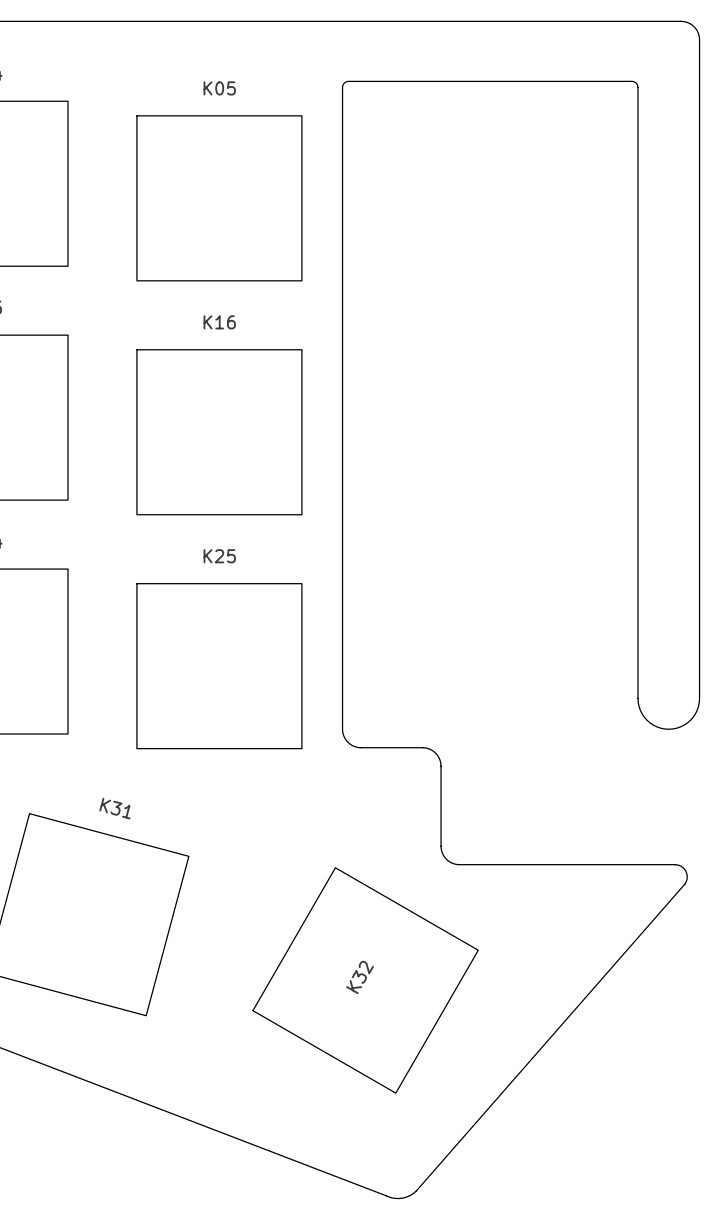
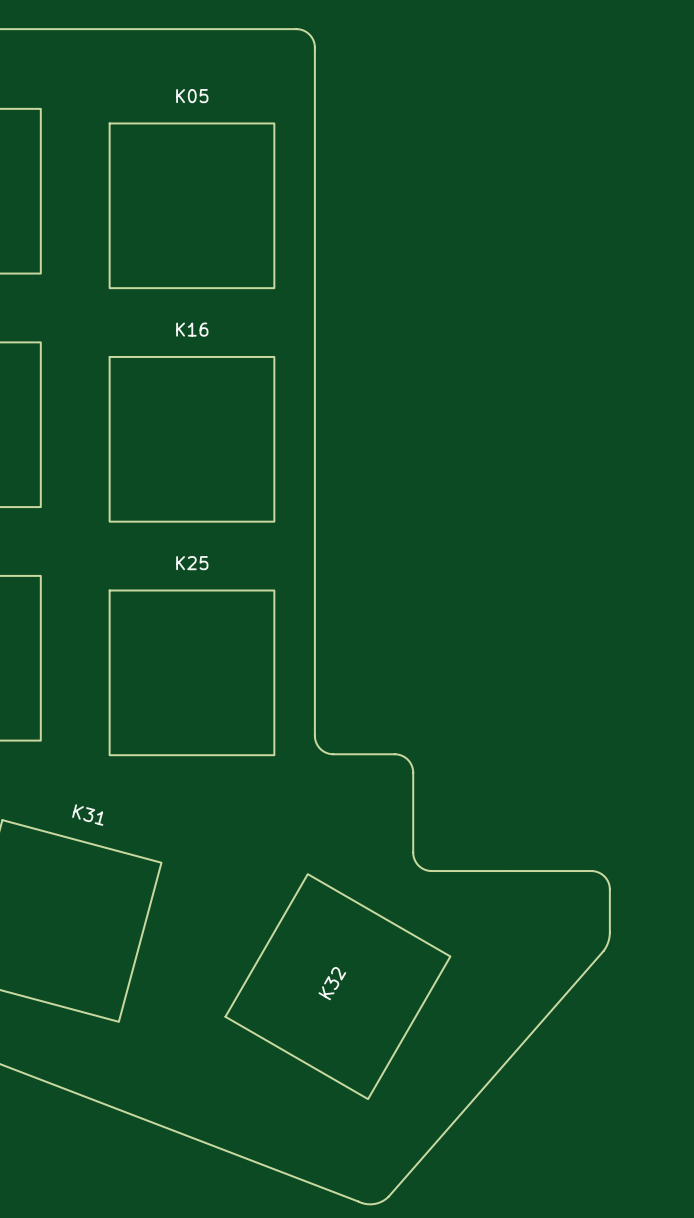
board edge: (324, 21) (681, 21) (690, 23) (697, 30) (699, 39) (699, 698) (695, 713) (684, 725) (668, 729) (653, 725) (642, 713) (638, 702) (637, 84) (631, 81) (348, 81) (344, 83) (342, 87) -> (296, 29) (307, 32) (314, 42) (314, 95)
board edge: (619, 864) (677, 865) (685, 871) (686, 879) (416, 1190) (402, 1198) (386, 1195) -> (591, 871) (602, 874) (609, 887) (609, 935) (603, 950) (388, 1196) (374, 1204) (358, 1201)

